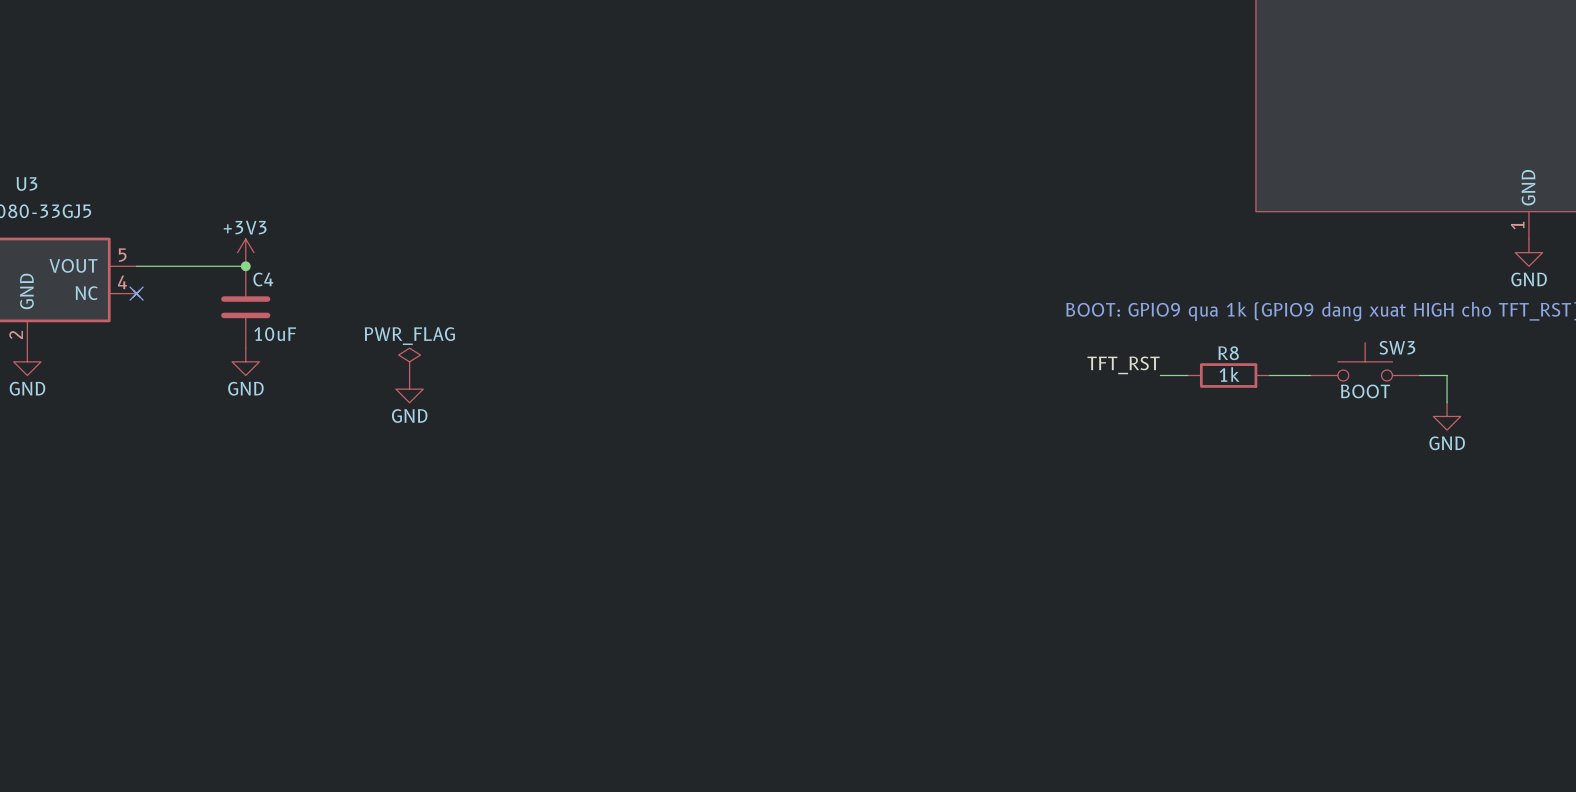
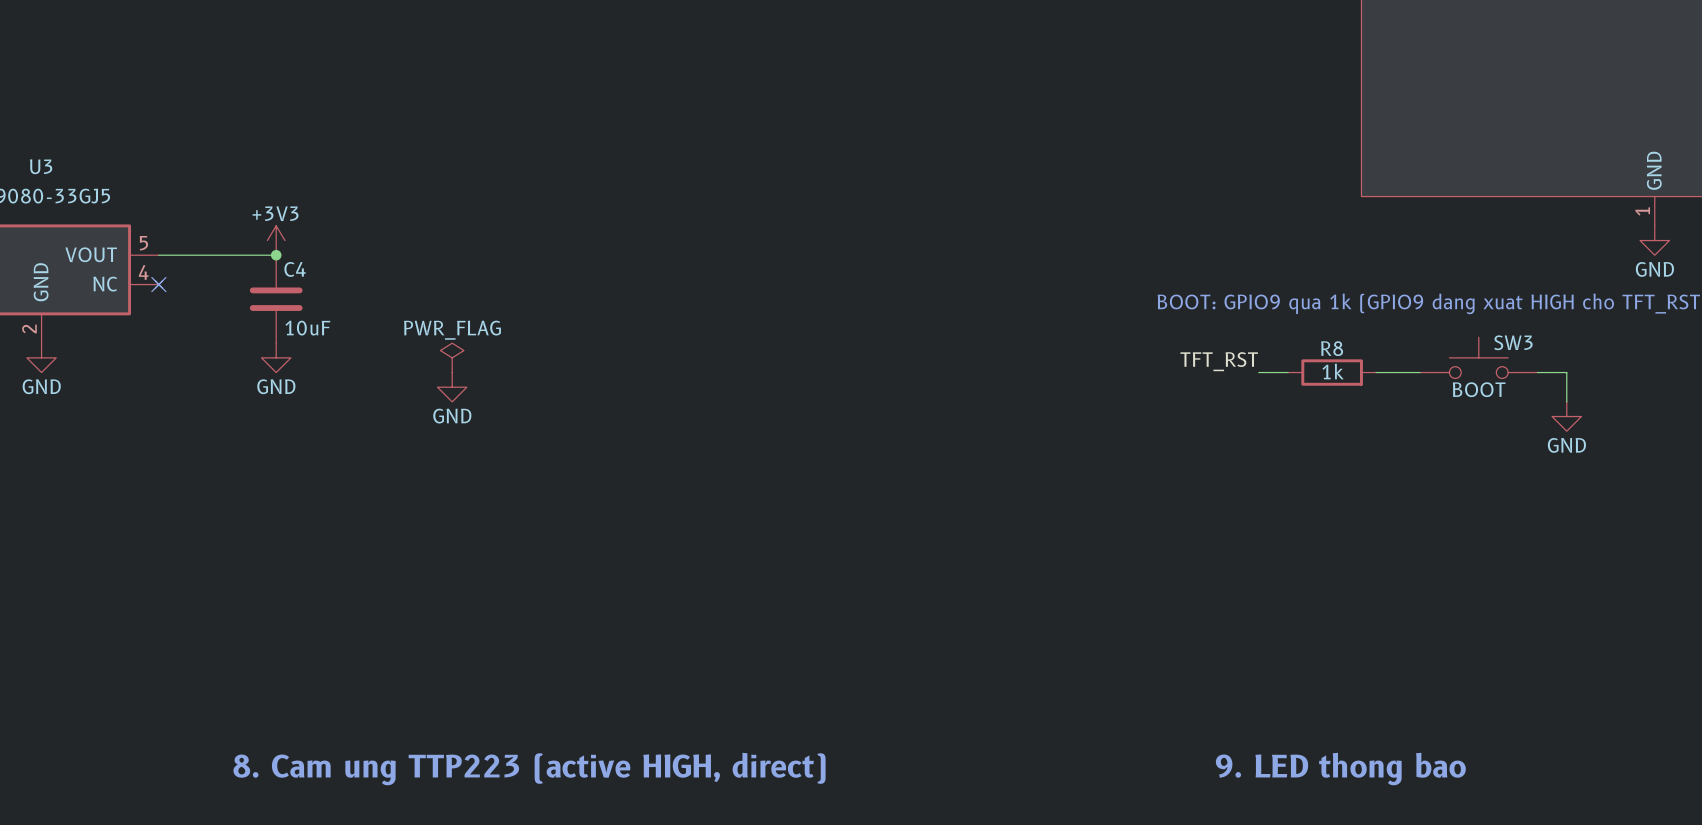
text: none -> 8. Cam ung TTP223 (active HIGH, direct) (529, 769)
text: none -> 9. LED thong bao (1340, 769)

